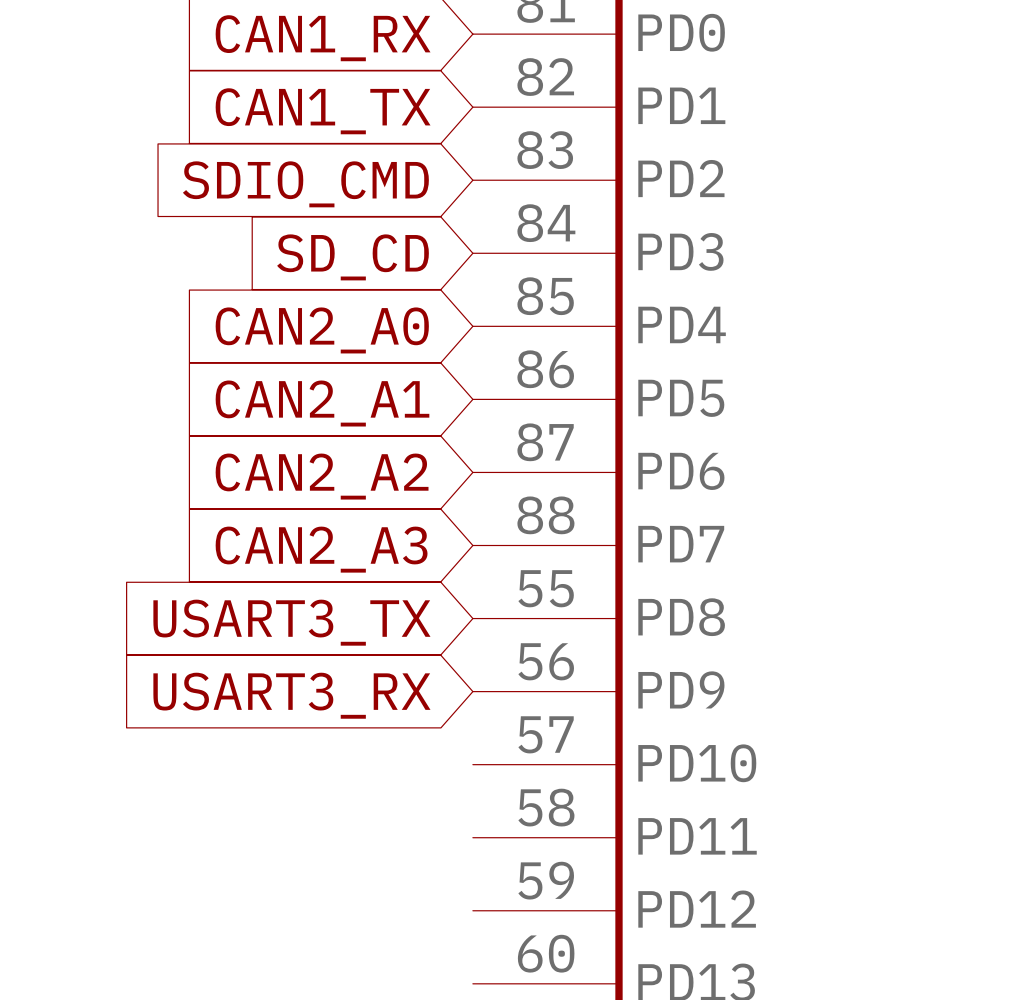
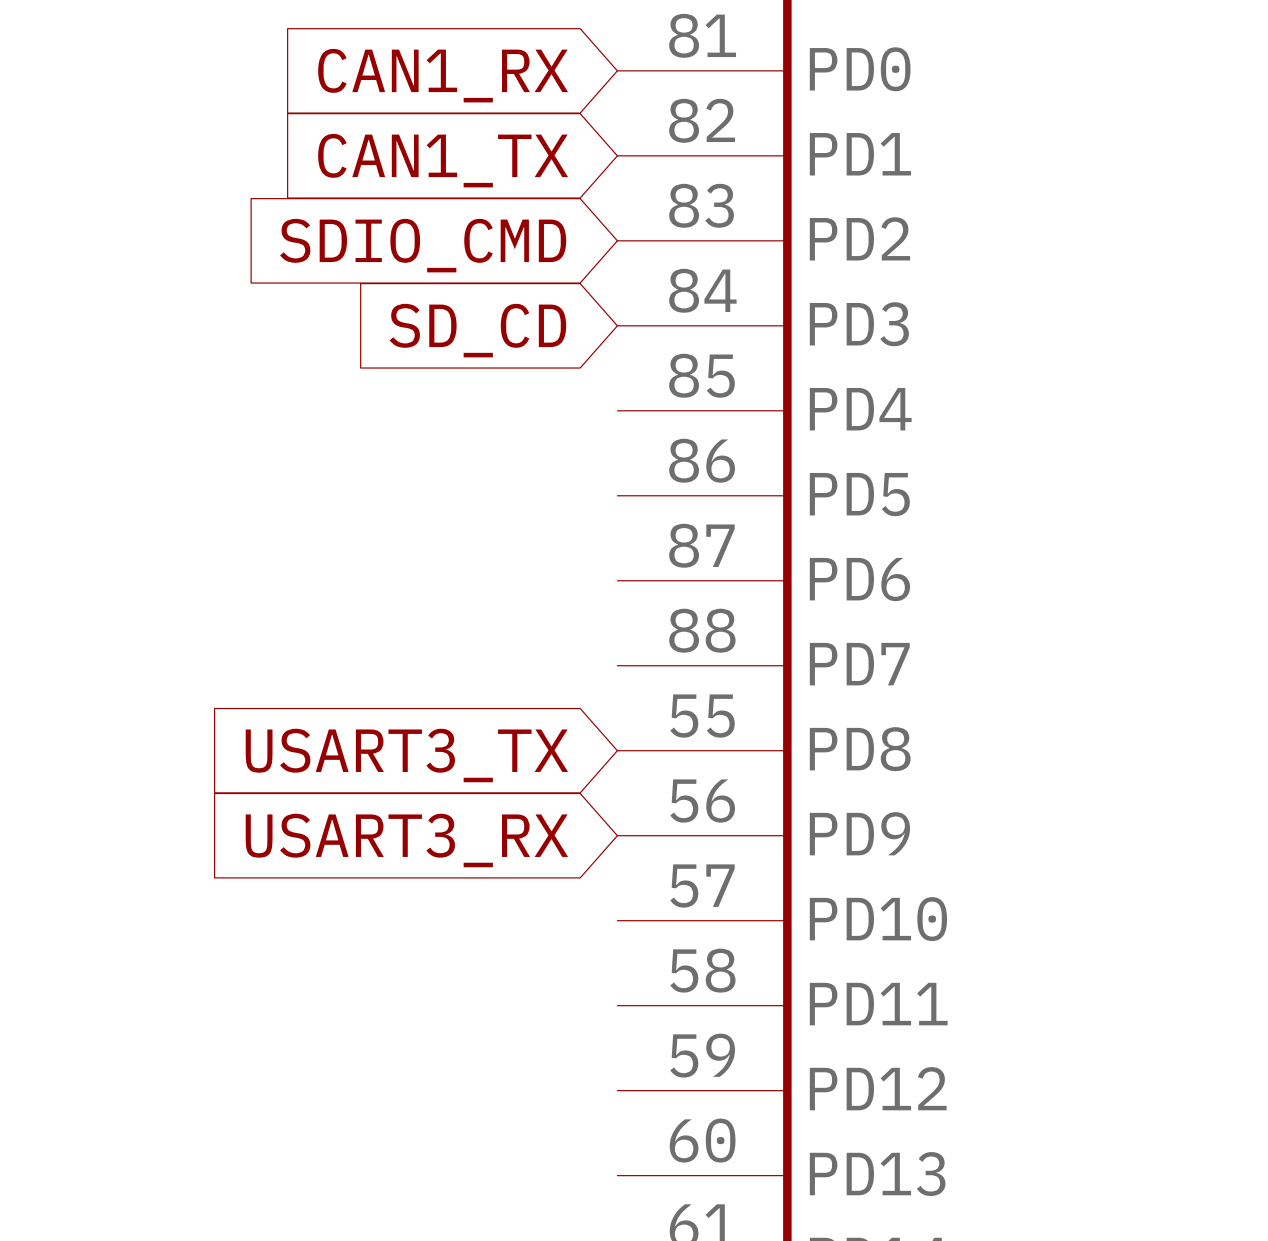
global label: CAN2_A0 (322, 330) -> none
global label: CAN2_A1 (322, 403) -> none
global label: CAN2_A2 (322, 476) -> none
global label: CAN2_A3 (321, 549) -> none

